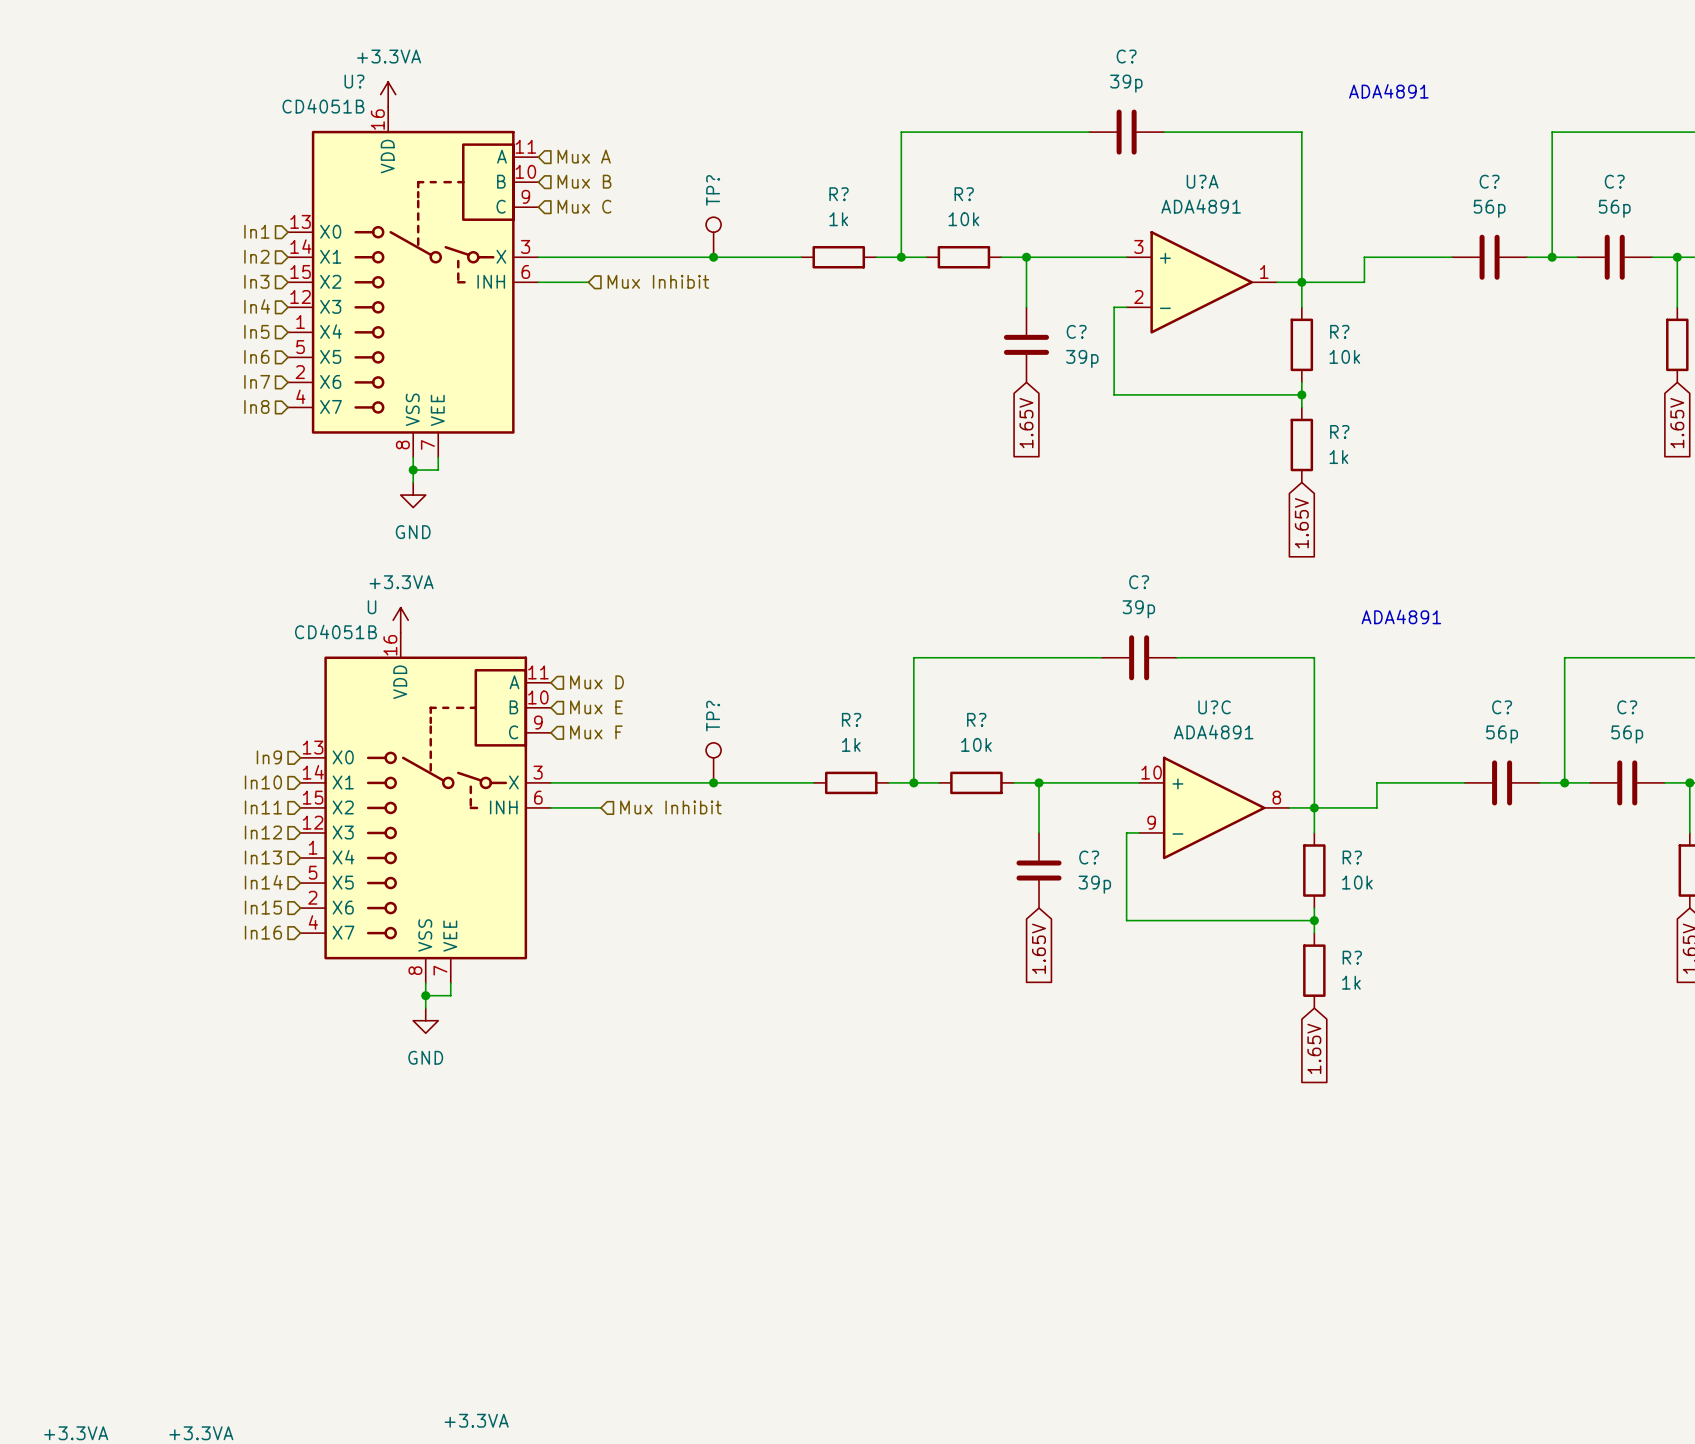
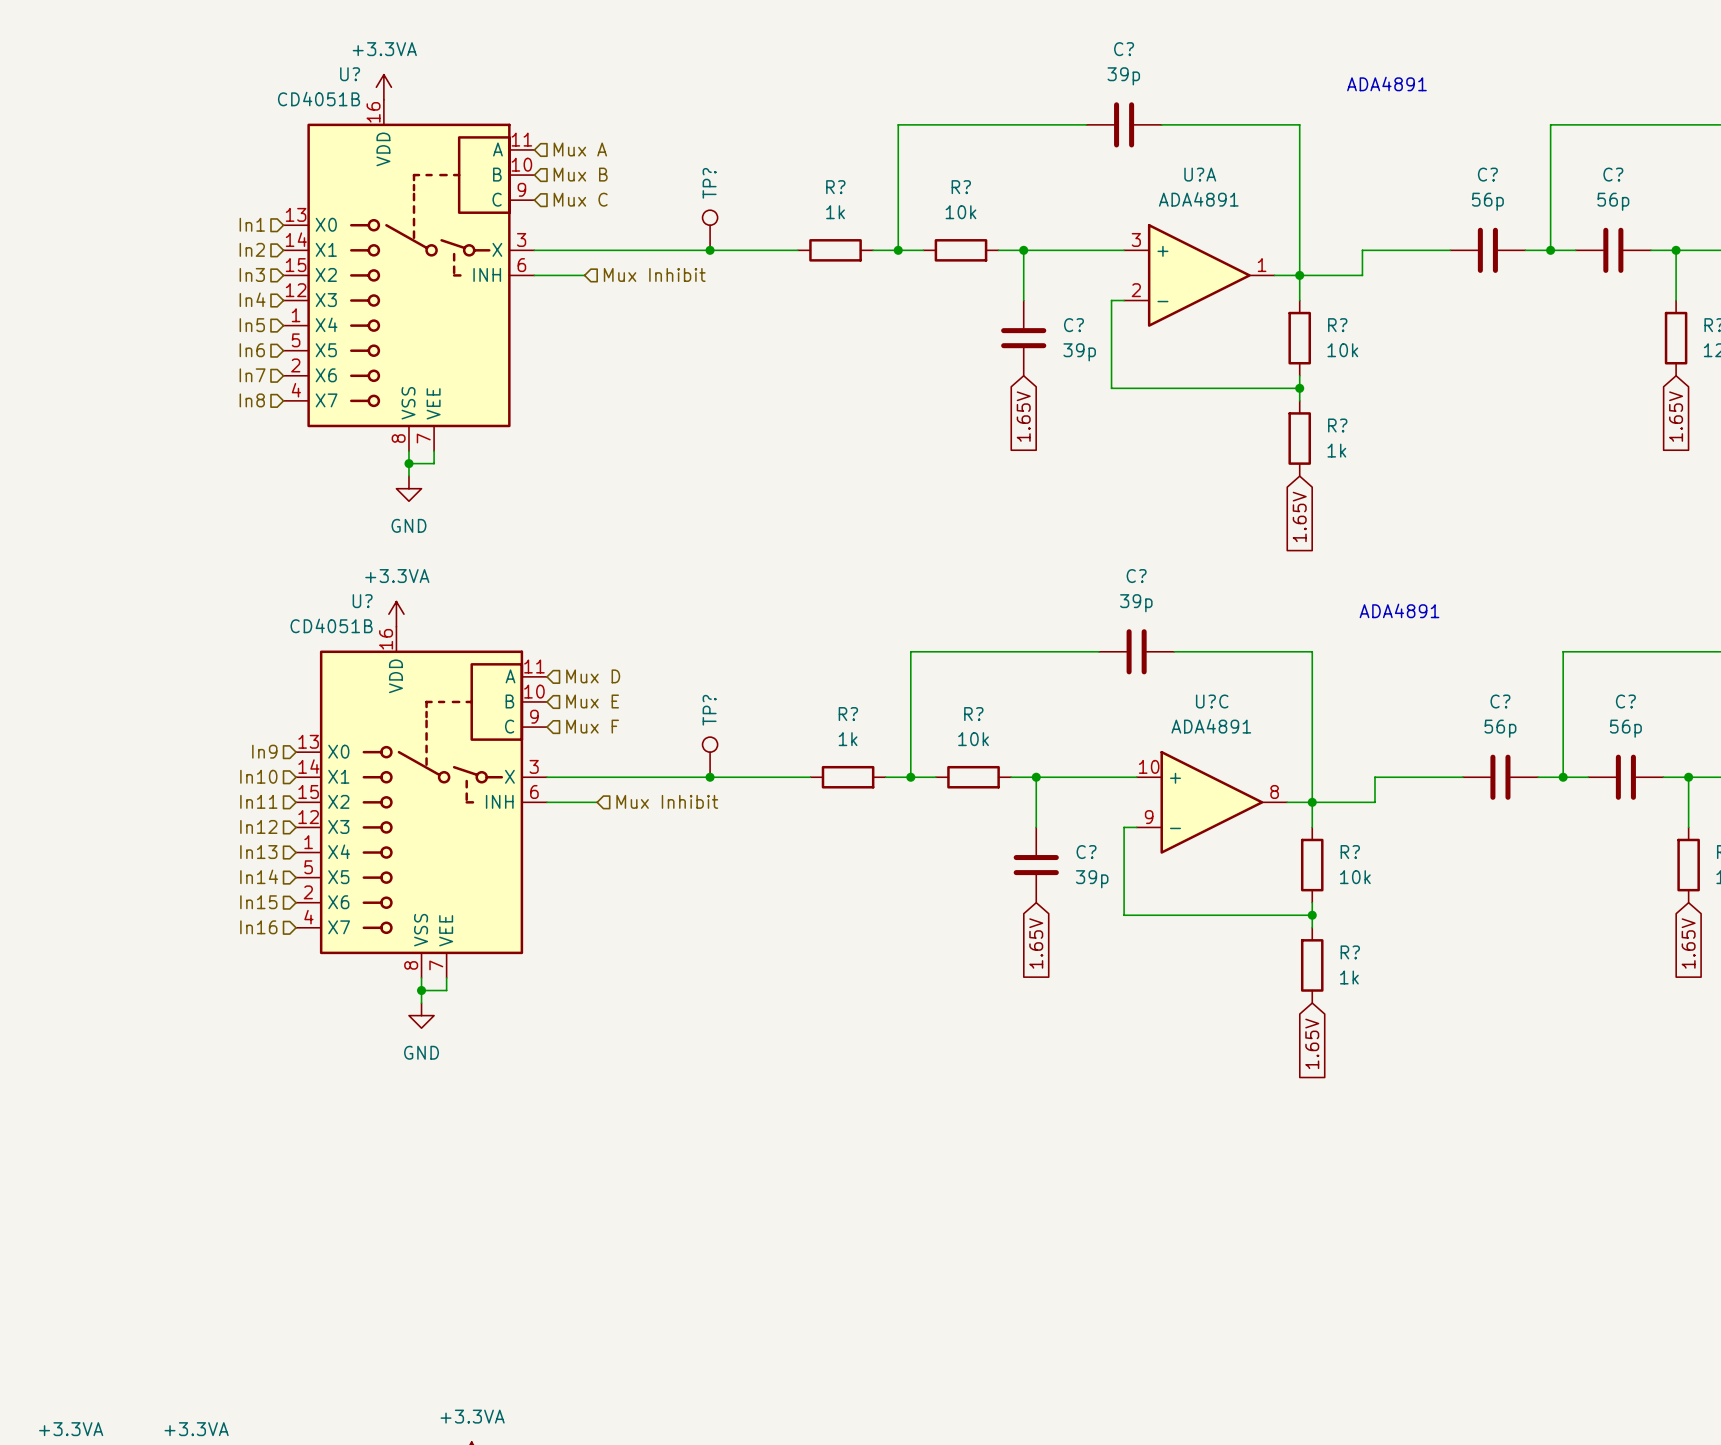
U name: U (372, 607) -> U? (362, 601)

